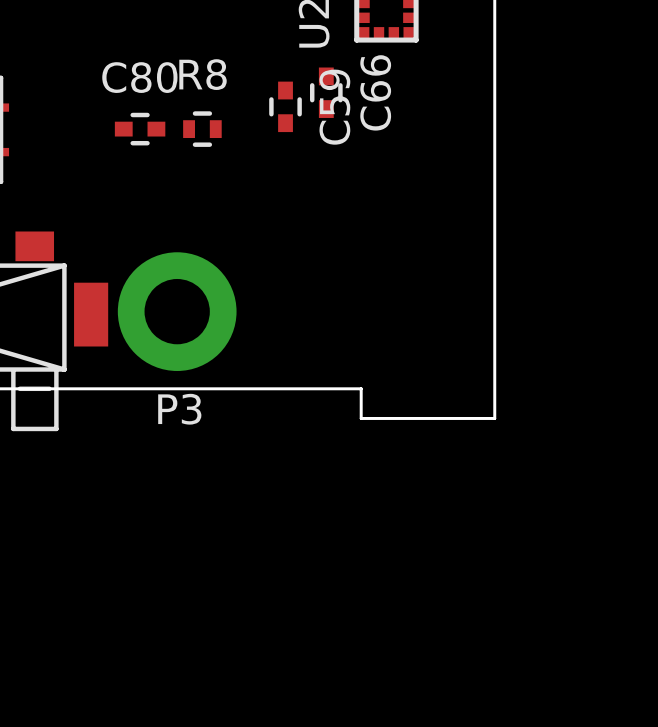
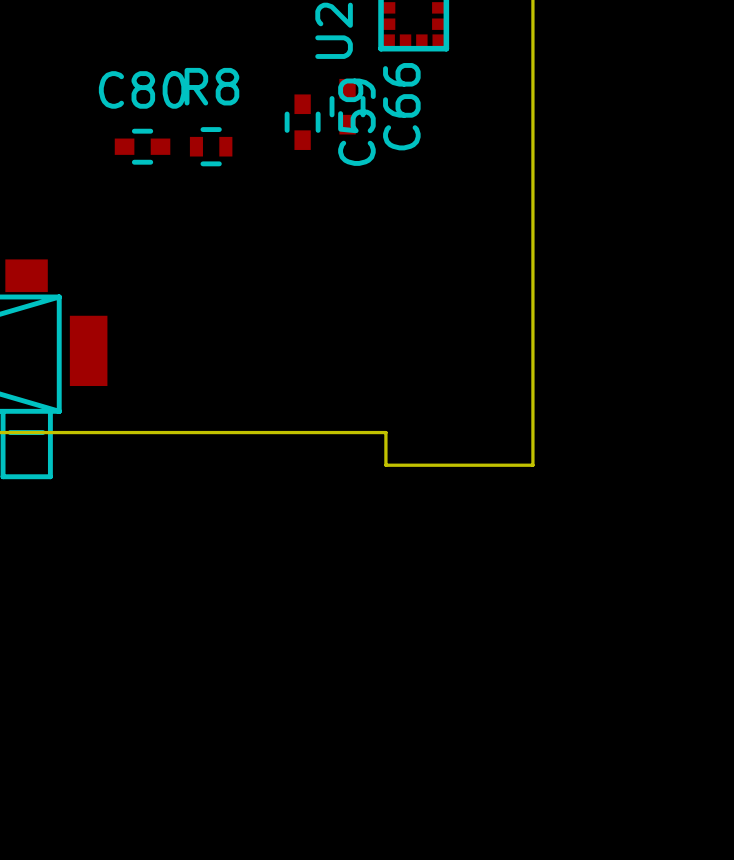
P3: (177, 311) -> none

